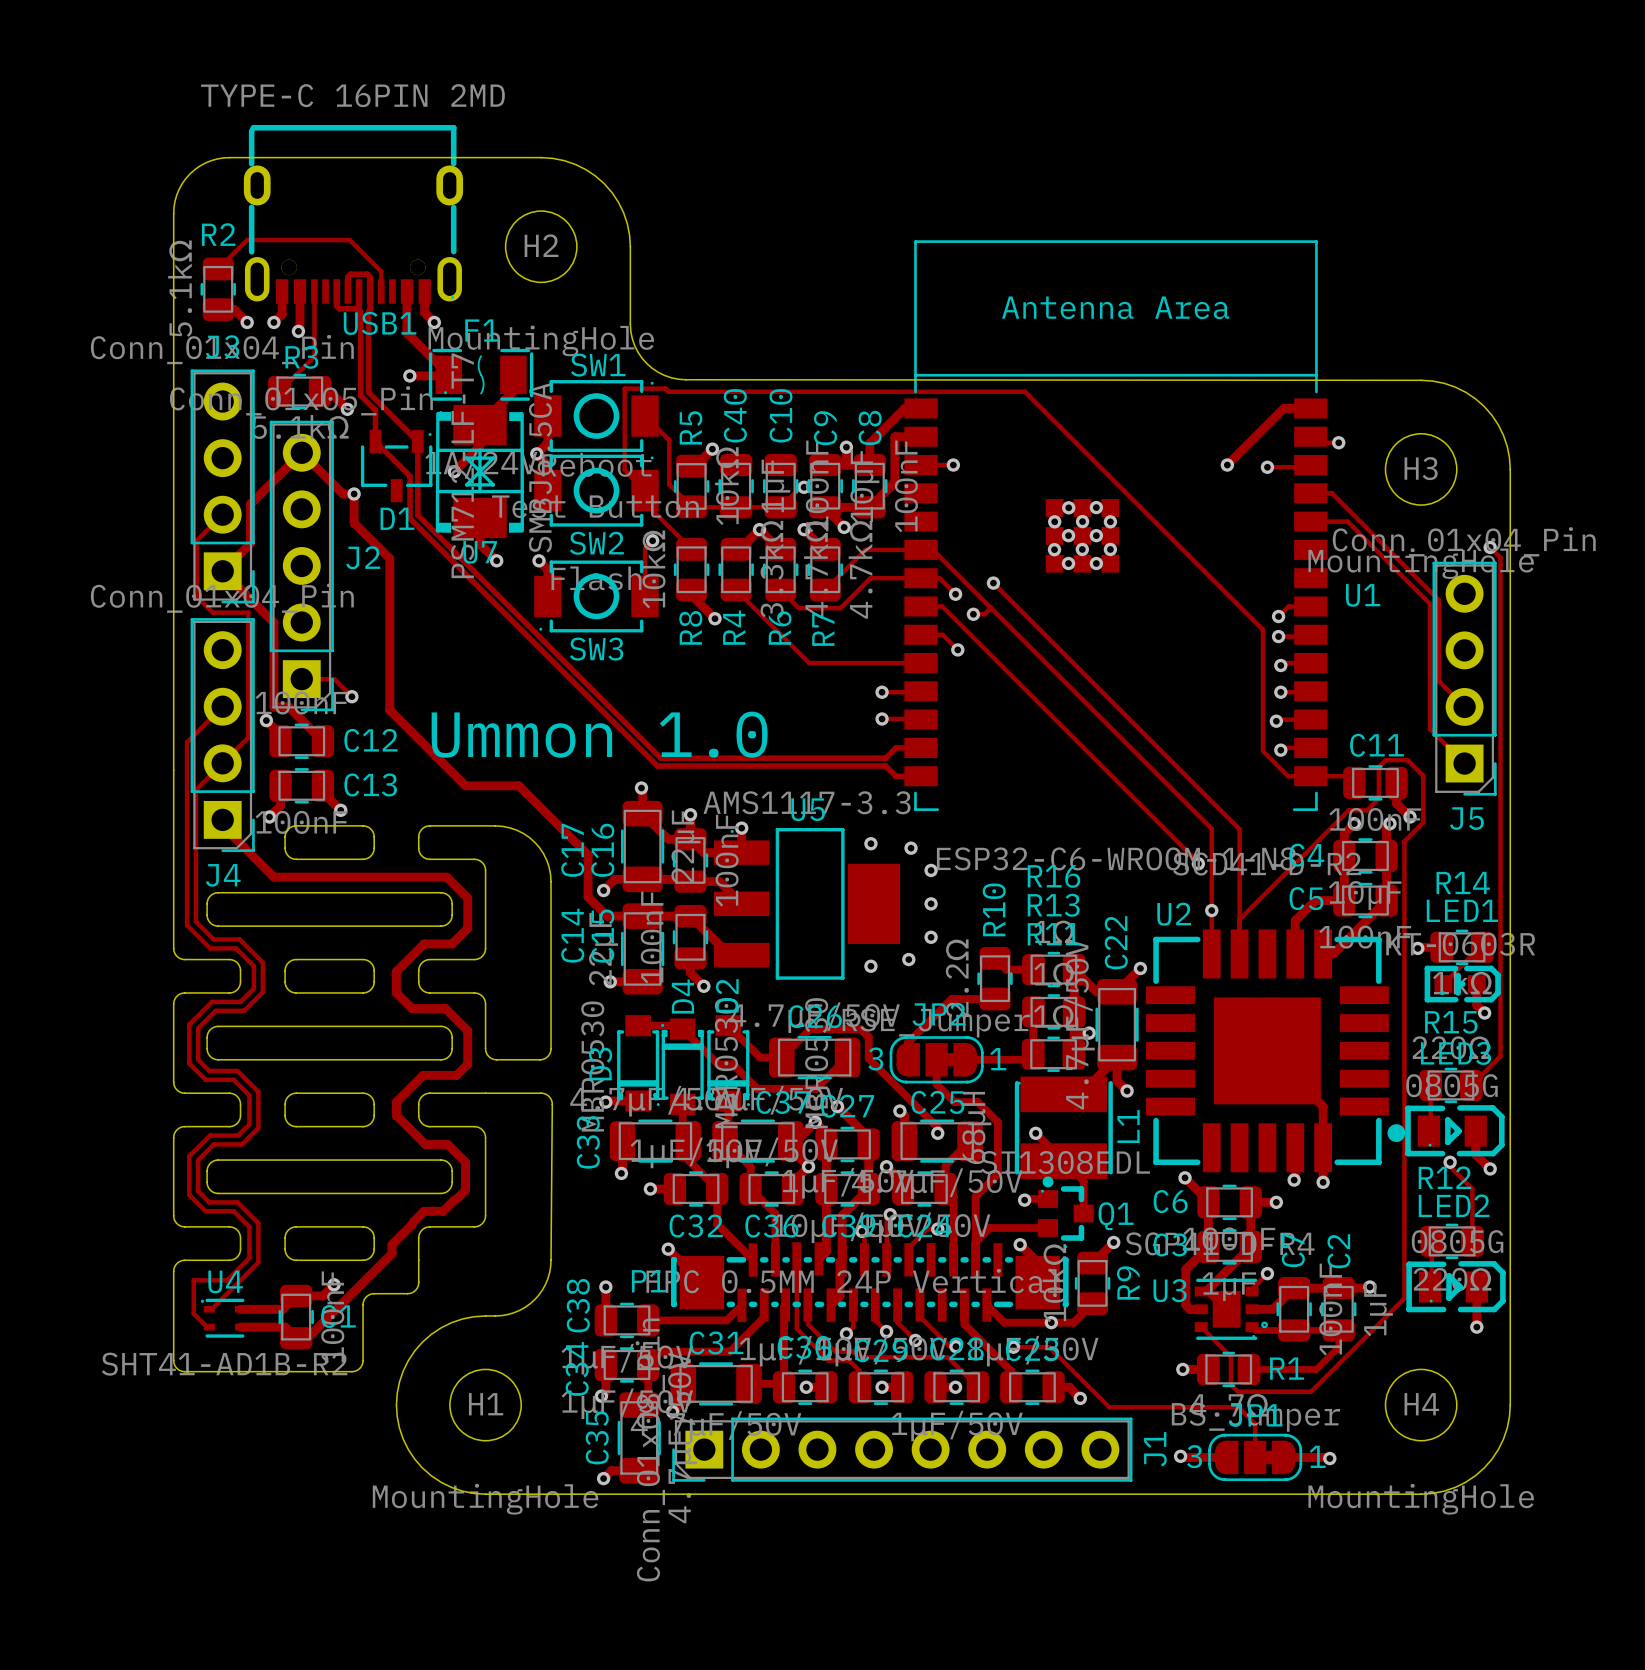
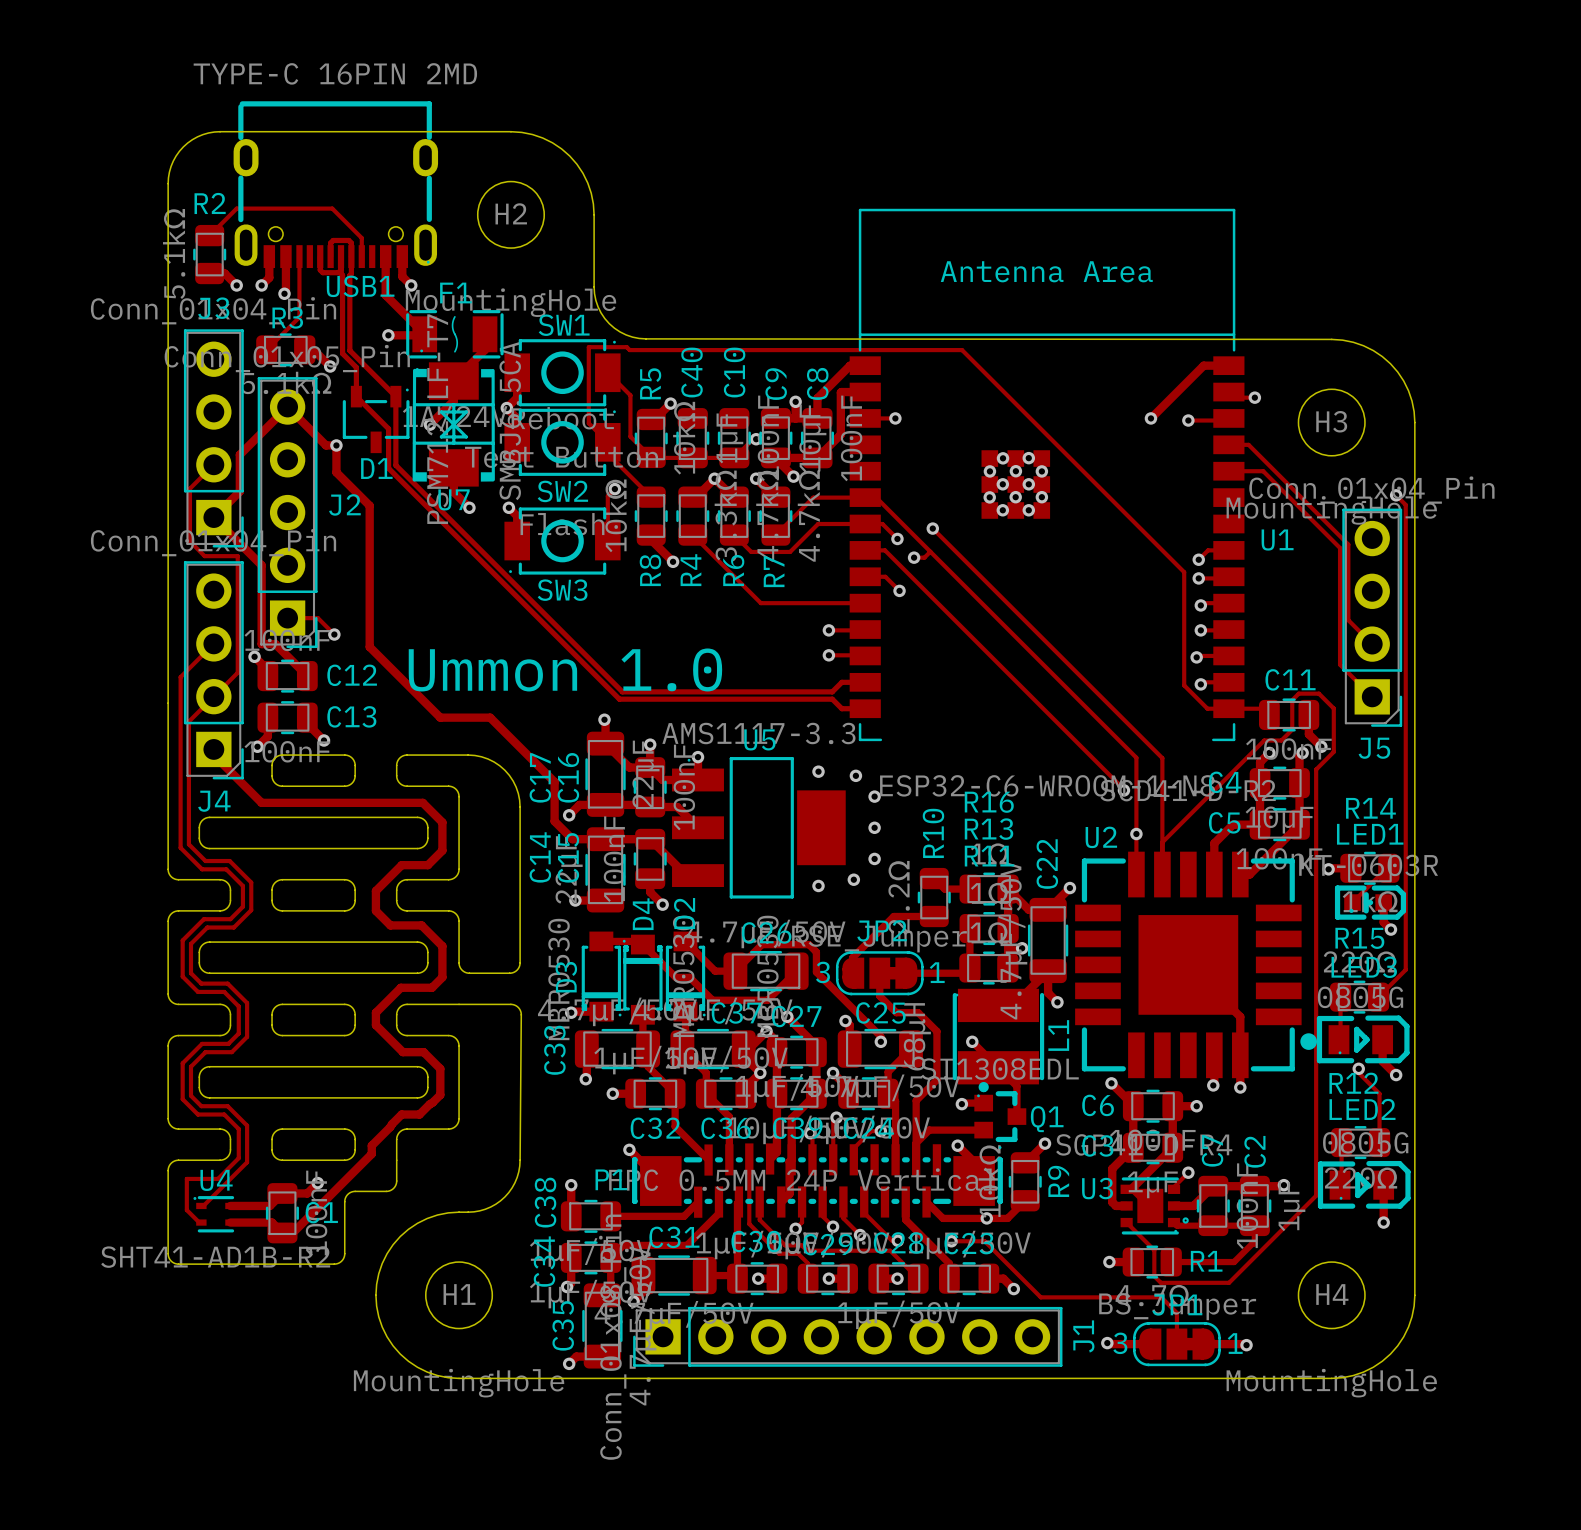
USB1 footprint: [243, 124, 464, 304] -> [233, 101, 439, 269]

